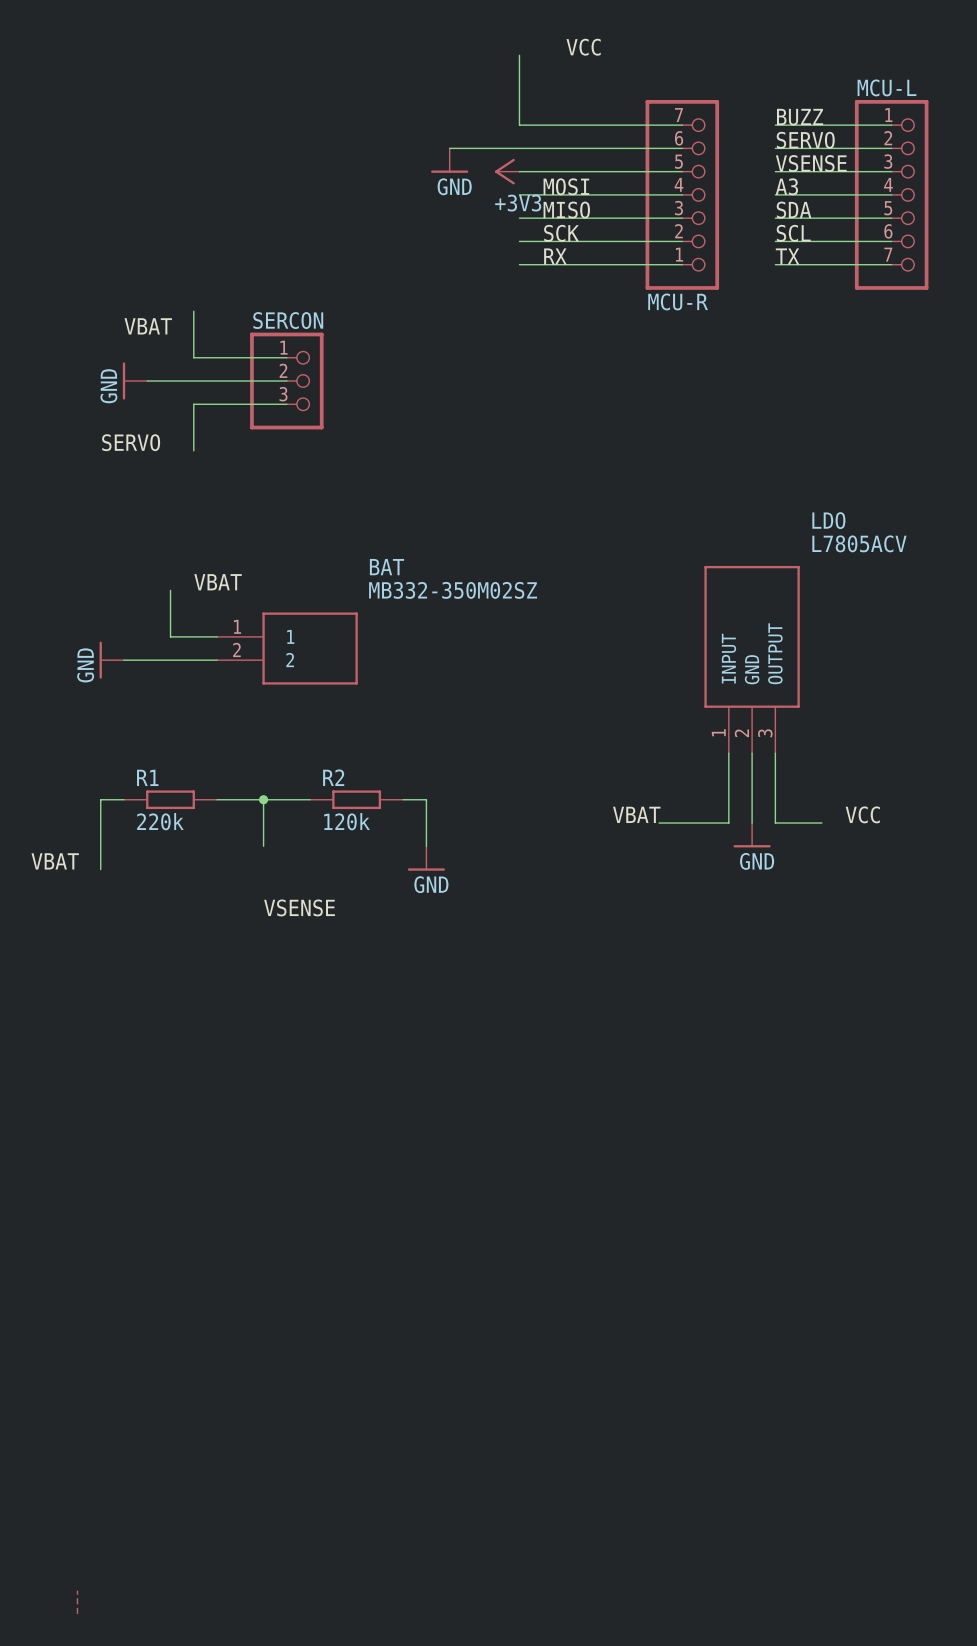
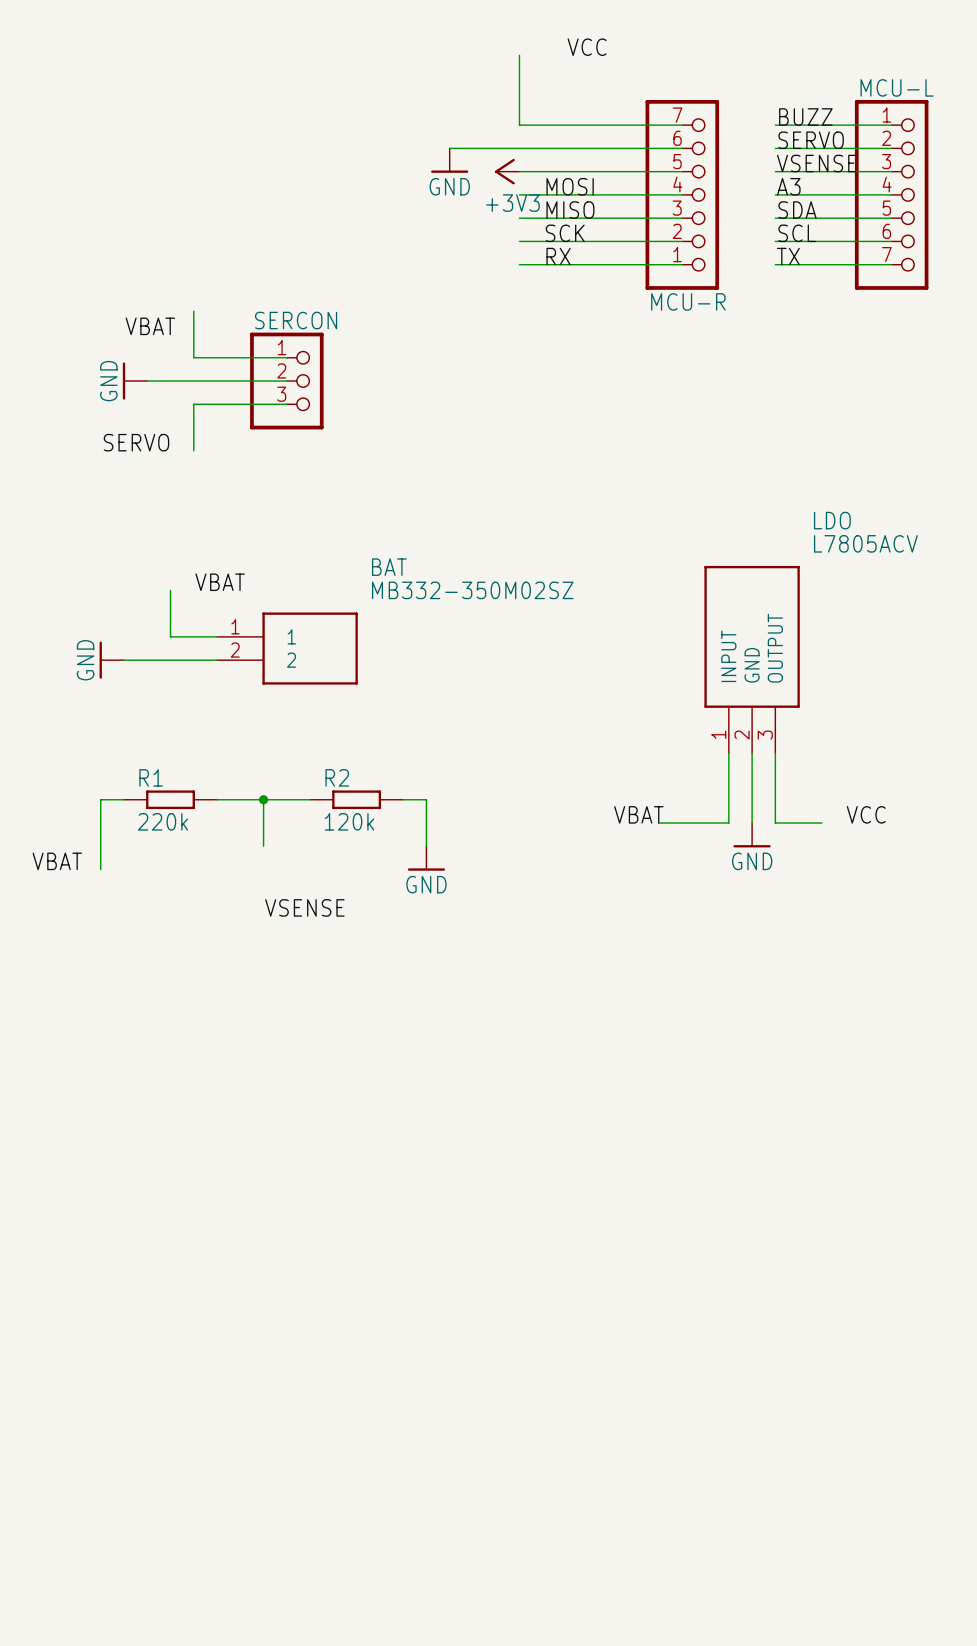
line: (77, 1590) (77, 1613) -> none

